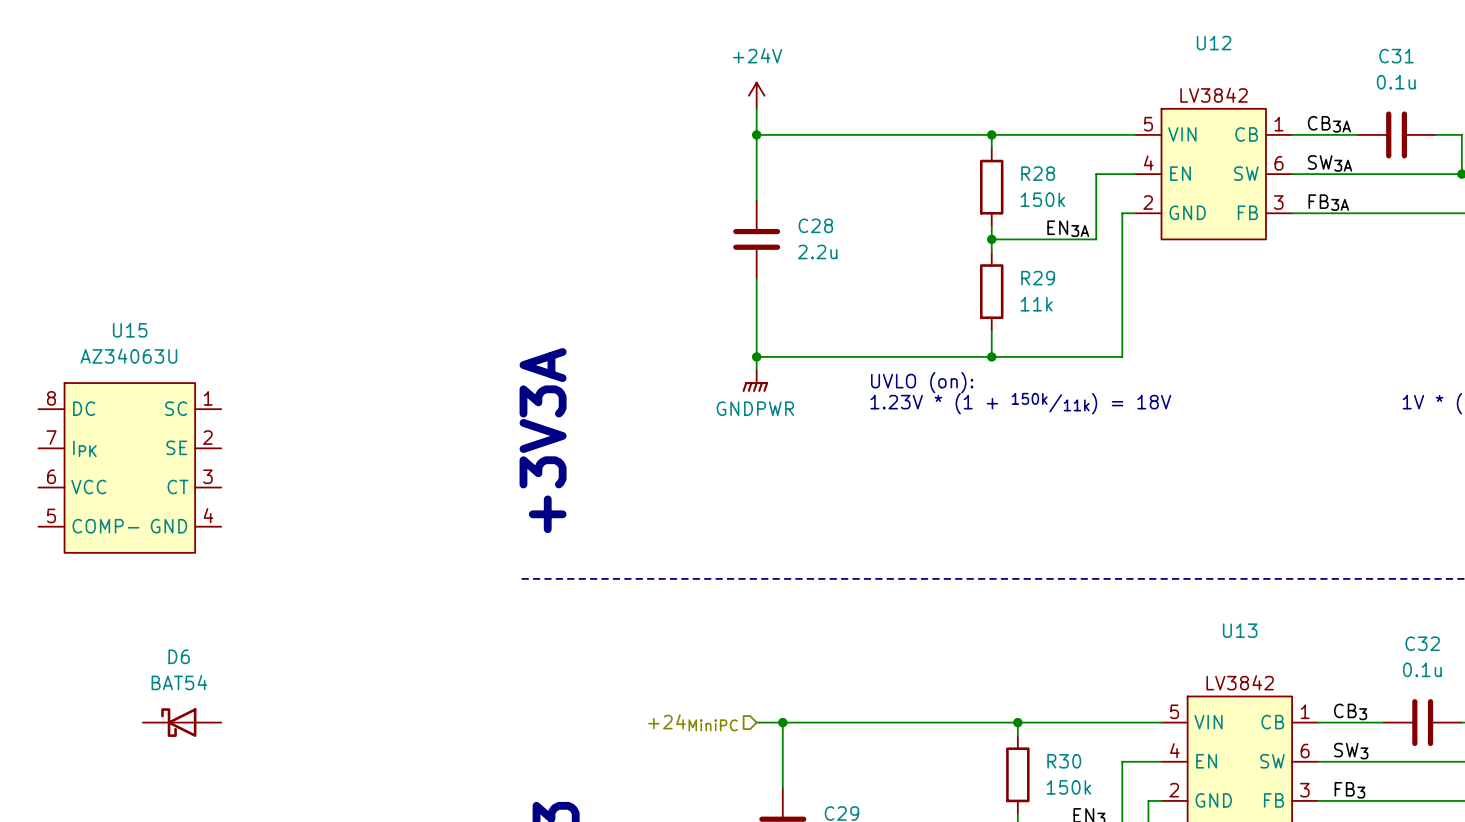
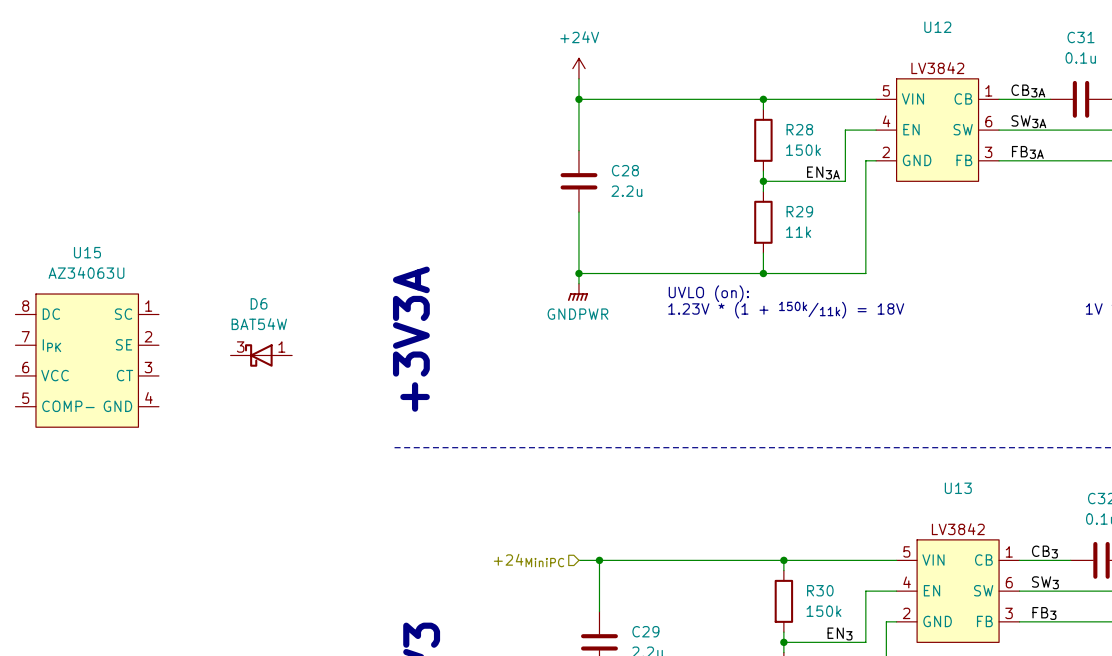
D6 pin number: none -> 3 (240, 347)
D6 pin number: none -> 1 (281, 347)
D6 value: BAT54 (179, 682) -> BAT54W (259, 324)
D6 position: (182, 722) -> (261, 355)

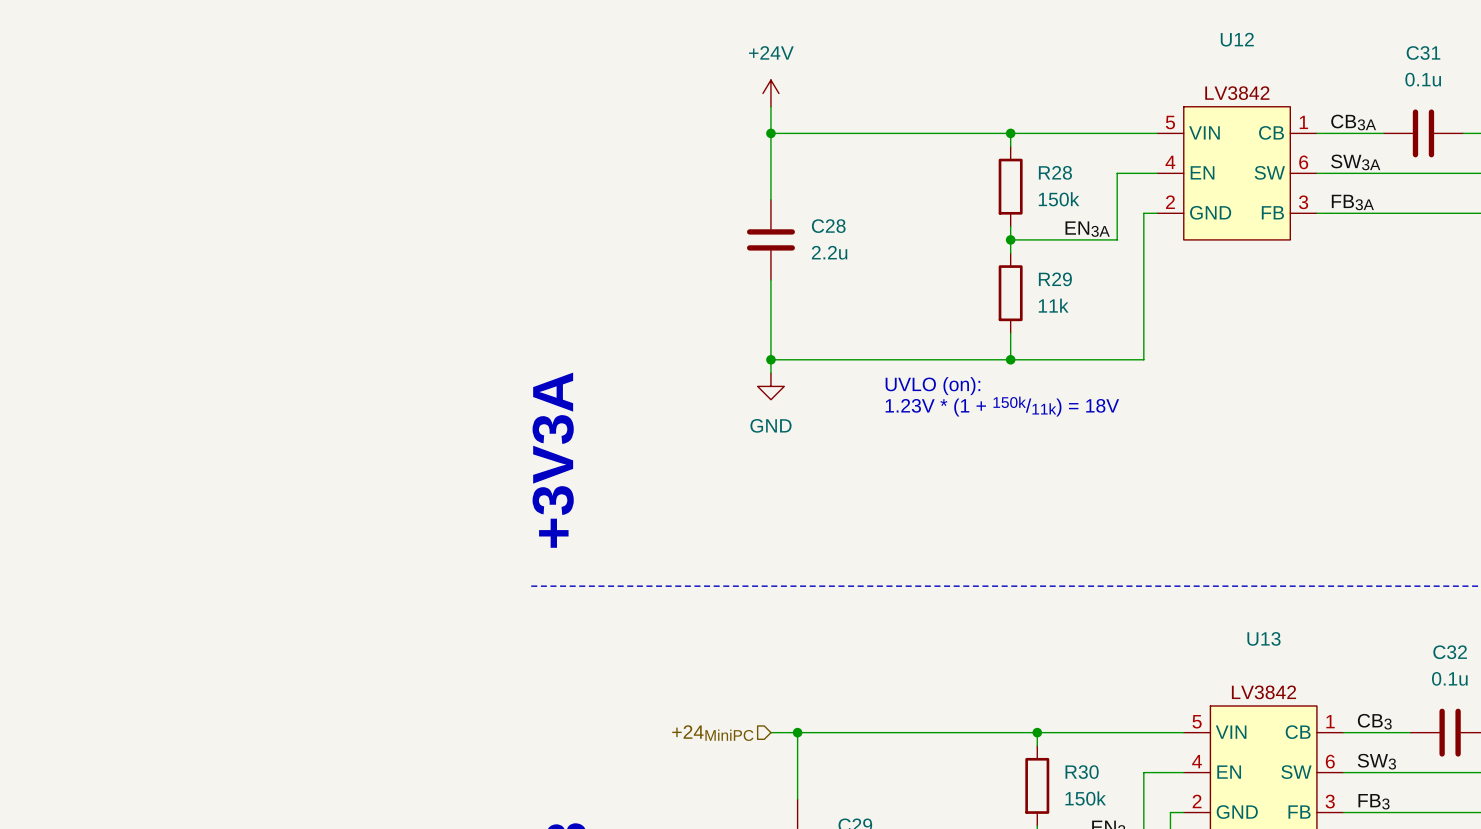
power symbol: GNDPWR (577, 292) -> GND (770, 386)
D6: BAT54W (261, 355) -> none
U15: AZ34063U (87, 360) -> none

